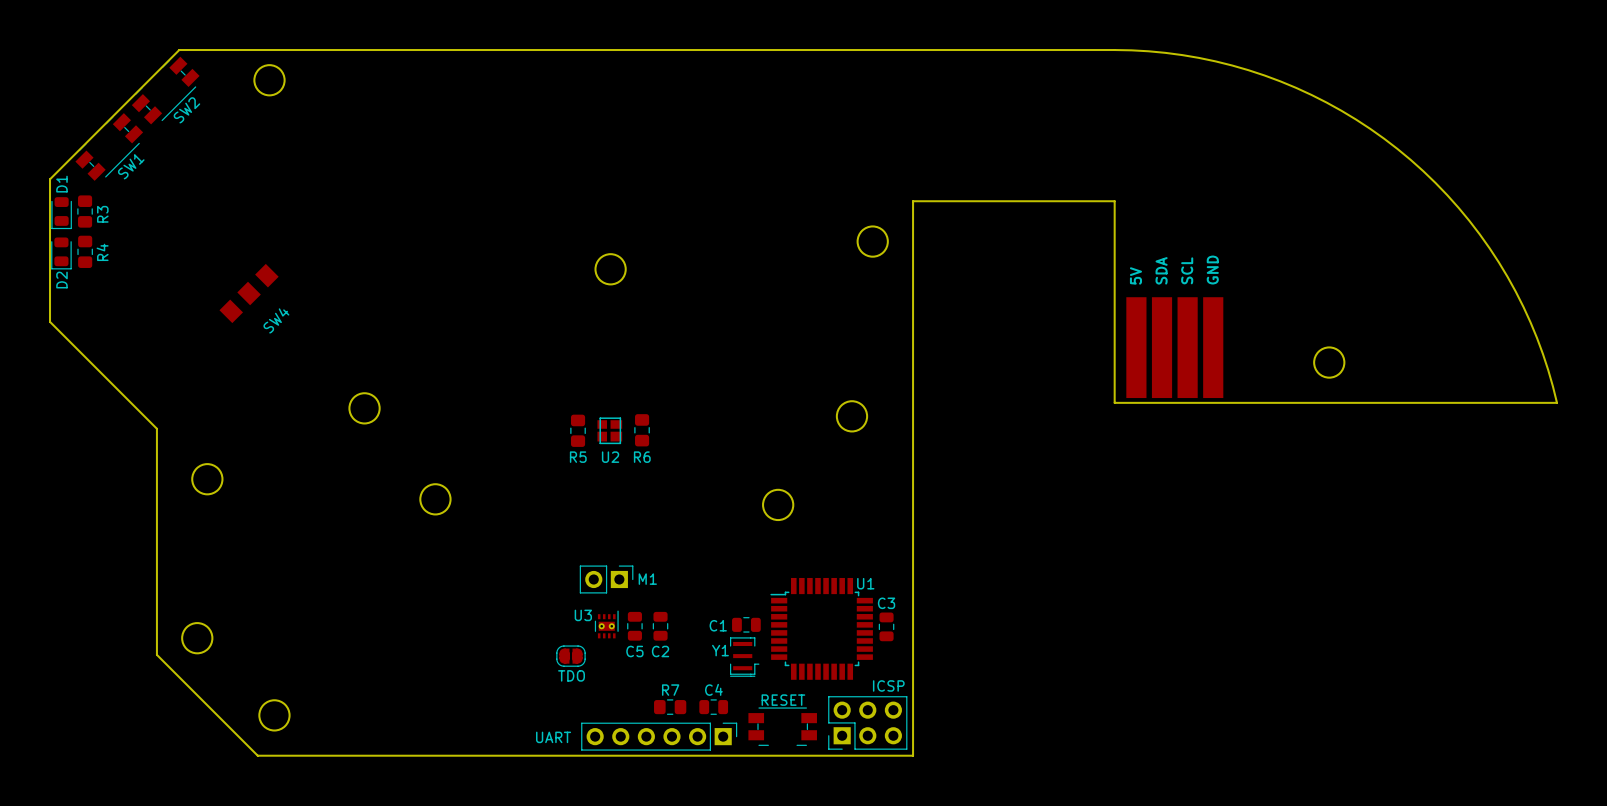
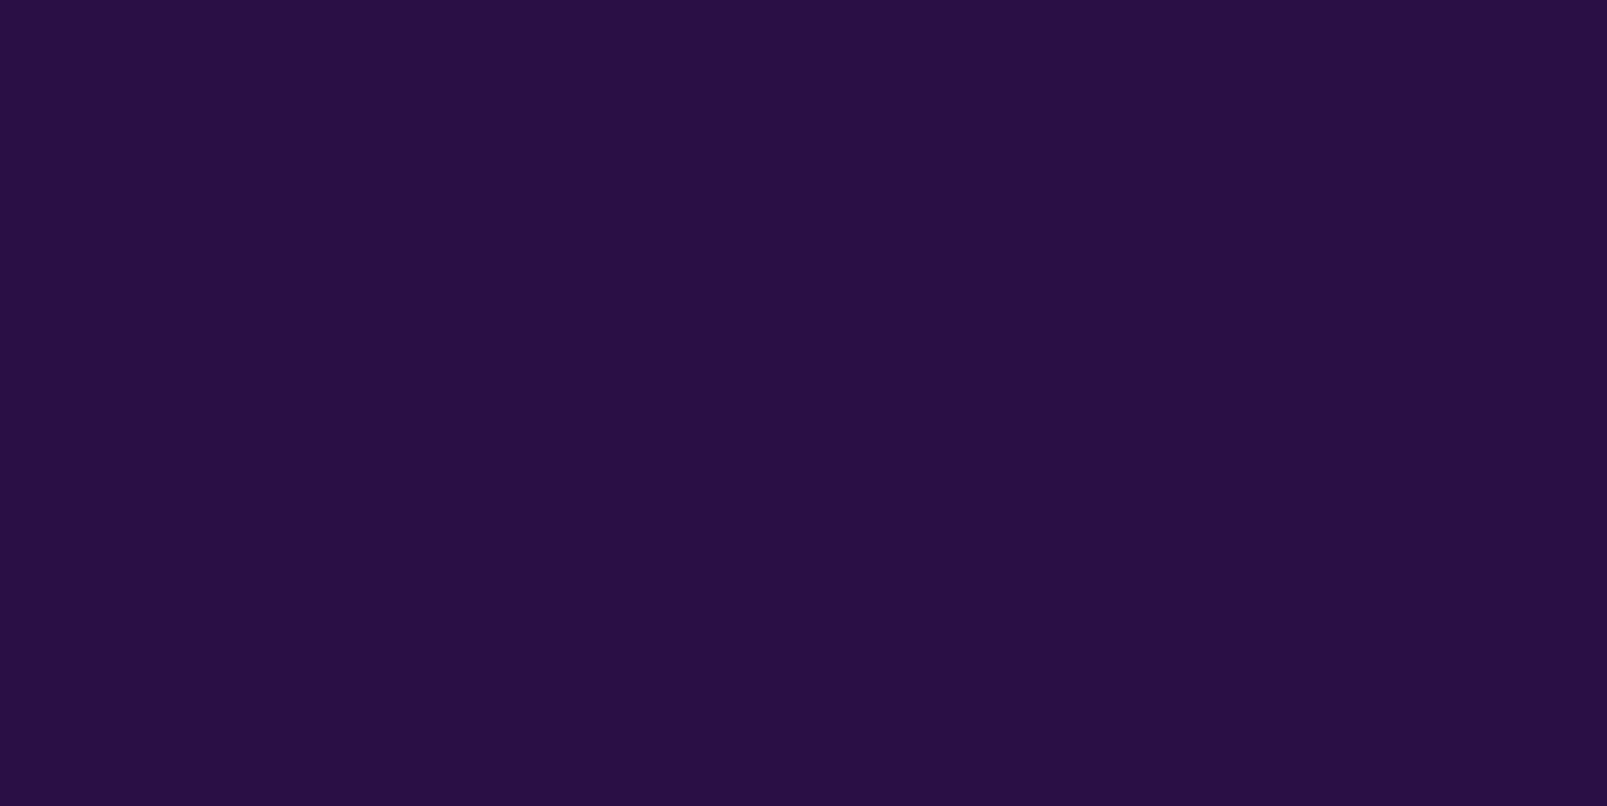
board edge: (179, 50) (1114, 50) (1165, 52) (1232, 65) (1280, 81) (1341, 110) (1384, 138) (1435, 182) (1469, 220) (1507, 276) (1537, 338) (1557, 402) (1114, 402) (1114, 201) (913, 201) (913, 755) (257, 755) (156, 654) (156, 428) (50, 321) (50, 179) (179, 50) -> none
round board edge: [253, 64, 286, 97] -> none
SW2: (165, 90) -> none
SW1: (109, 146) -> none
R3: (85, 211) -> none
D1: (61, 213) -> none
round board edge: [856, 225, 889, 258] -> none
R4: (85, 251) -> none
D2: (61, 253) -> none
round board edge: [594, 253, 627, 286] -> none
text: SDA (1161, 270) -> none
text: SCL (1187, 270) -> none
text: GND (1212, 270) -> none
text: 5V (1135, 275) -> none
SW4: (249, 293) -> none
round board edge: [1313, 346, 1346, 379] -> none
part: (1174, 347) -> none
round board edge: [348, 392, 381, 425] -> none
round board edge: [835, 400, 869, 433] -> none
R5: (578, 430) -> none
U2: (609, 430) -> none
R6: (642, 430) -> none
round board edge: [191, 463, 224, 496] -> none
round board edge: [419, 483, 452, 516] -> none
round board edge: [762, 488, 795, 522] -> none
M1: (606, 579) -> none
round board edge: [181, 622, 214, 655] -> none
U3: (606, 624) -> none
C1: (746, 624) -> none
C5: (634, 626) -> none
C2: (660, 626) -> none
C3: (886, 626) -> none
U1: (821, 628) -> none
part: (570, 656) -> none
Y1: (744, 657) -> none
text: TDO (571, 675) -> none
text: ICSP (888, 685) -> none
round board edge: [258, 699, 291, 732] -> none
text: RESET (783, 700) -> none
R7: (670, 707) -> none
C4: (713, 707) -> none
part: (867, 722) -> none
part: (782, 726) -> none
part: (659, 736) -> none
text: UART (553, 737) -> none

